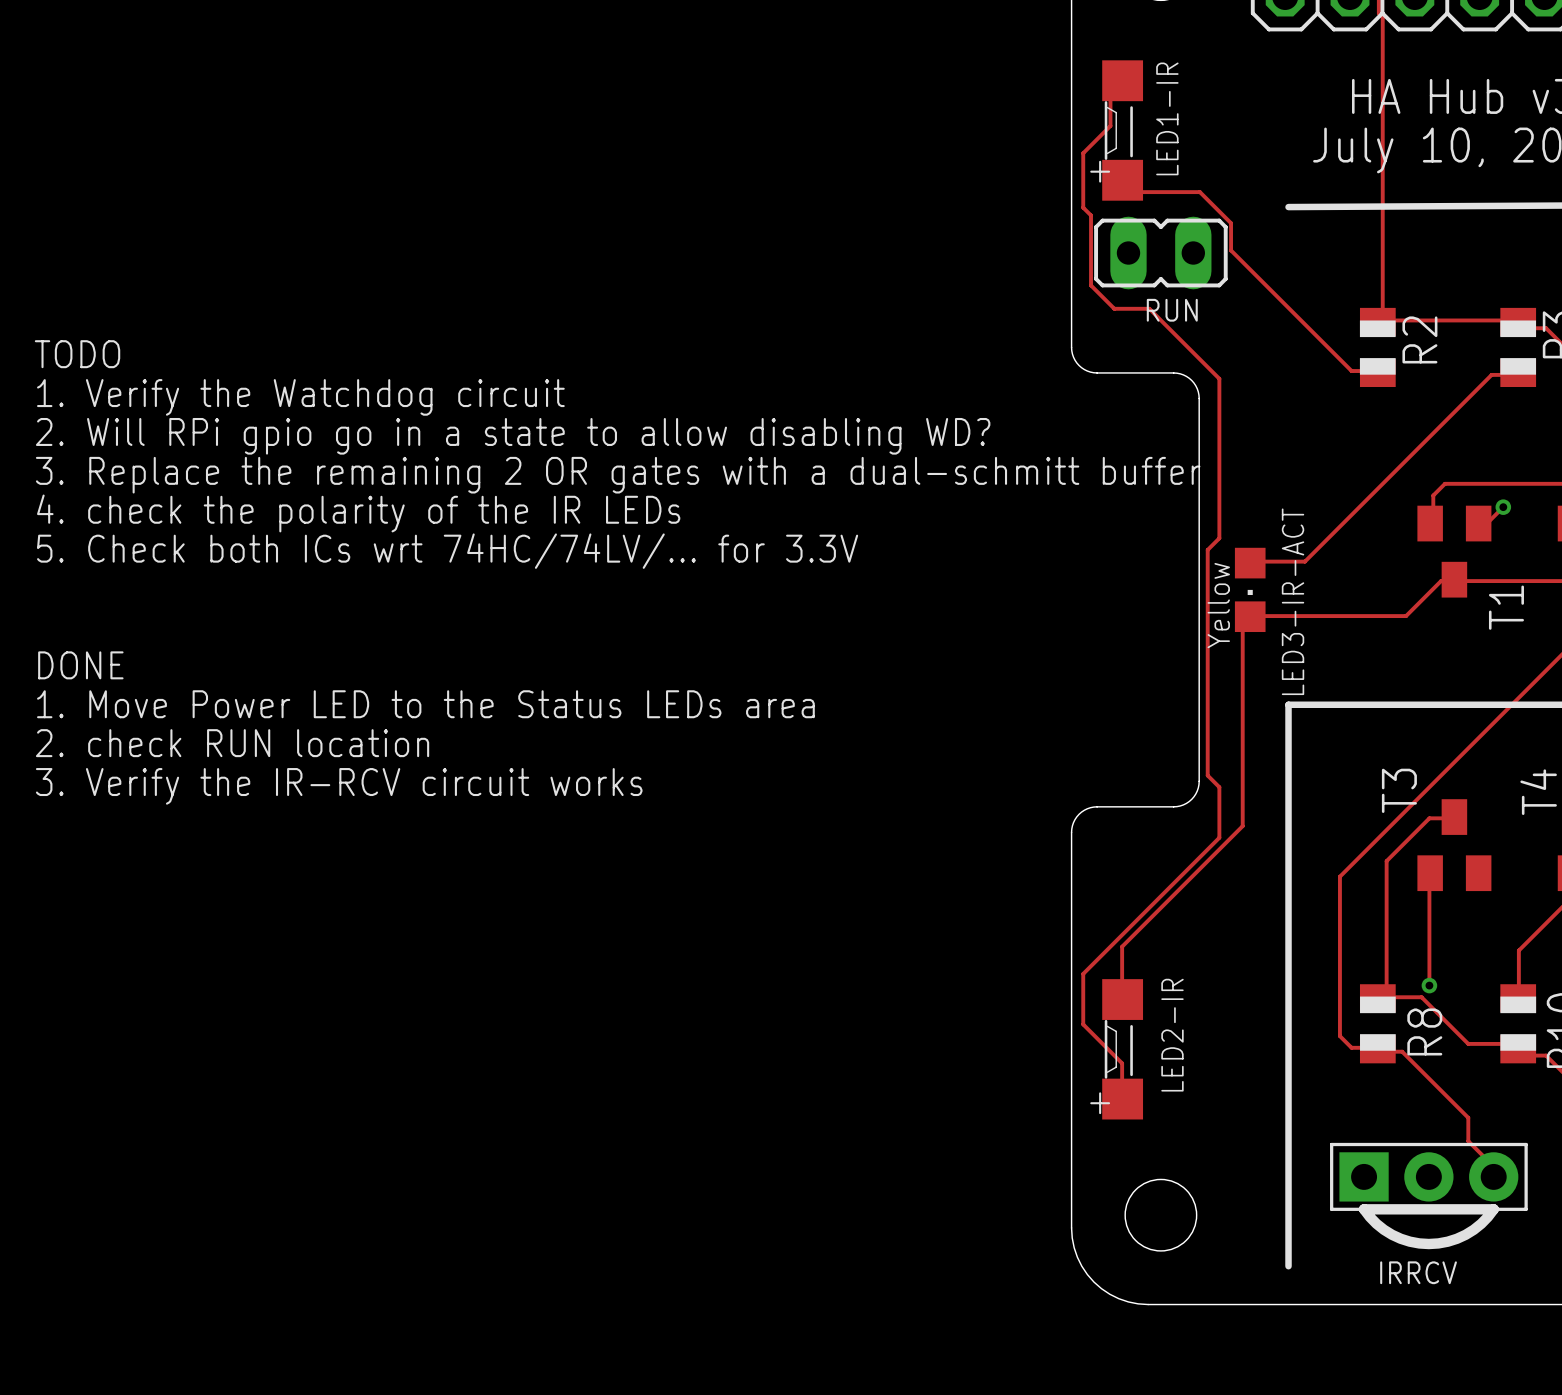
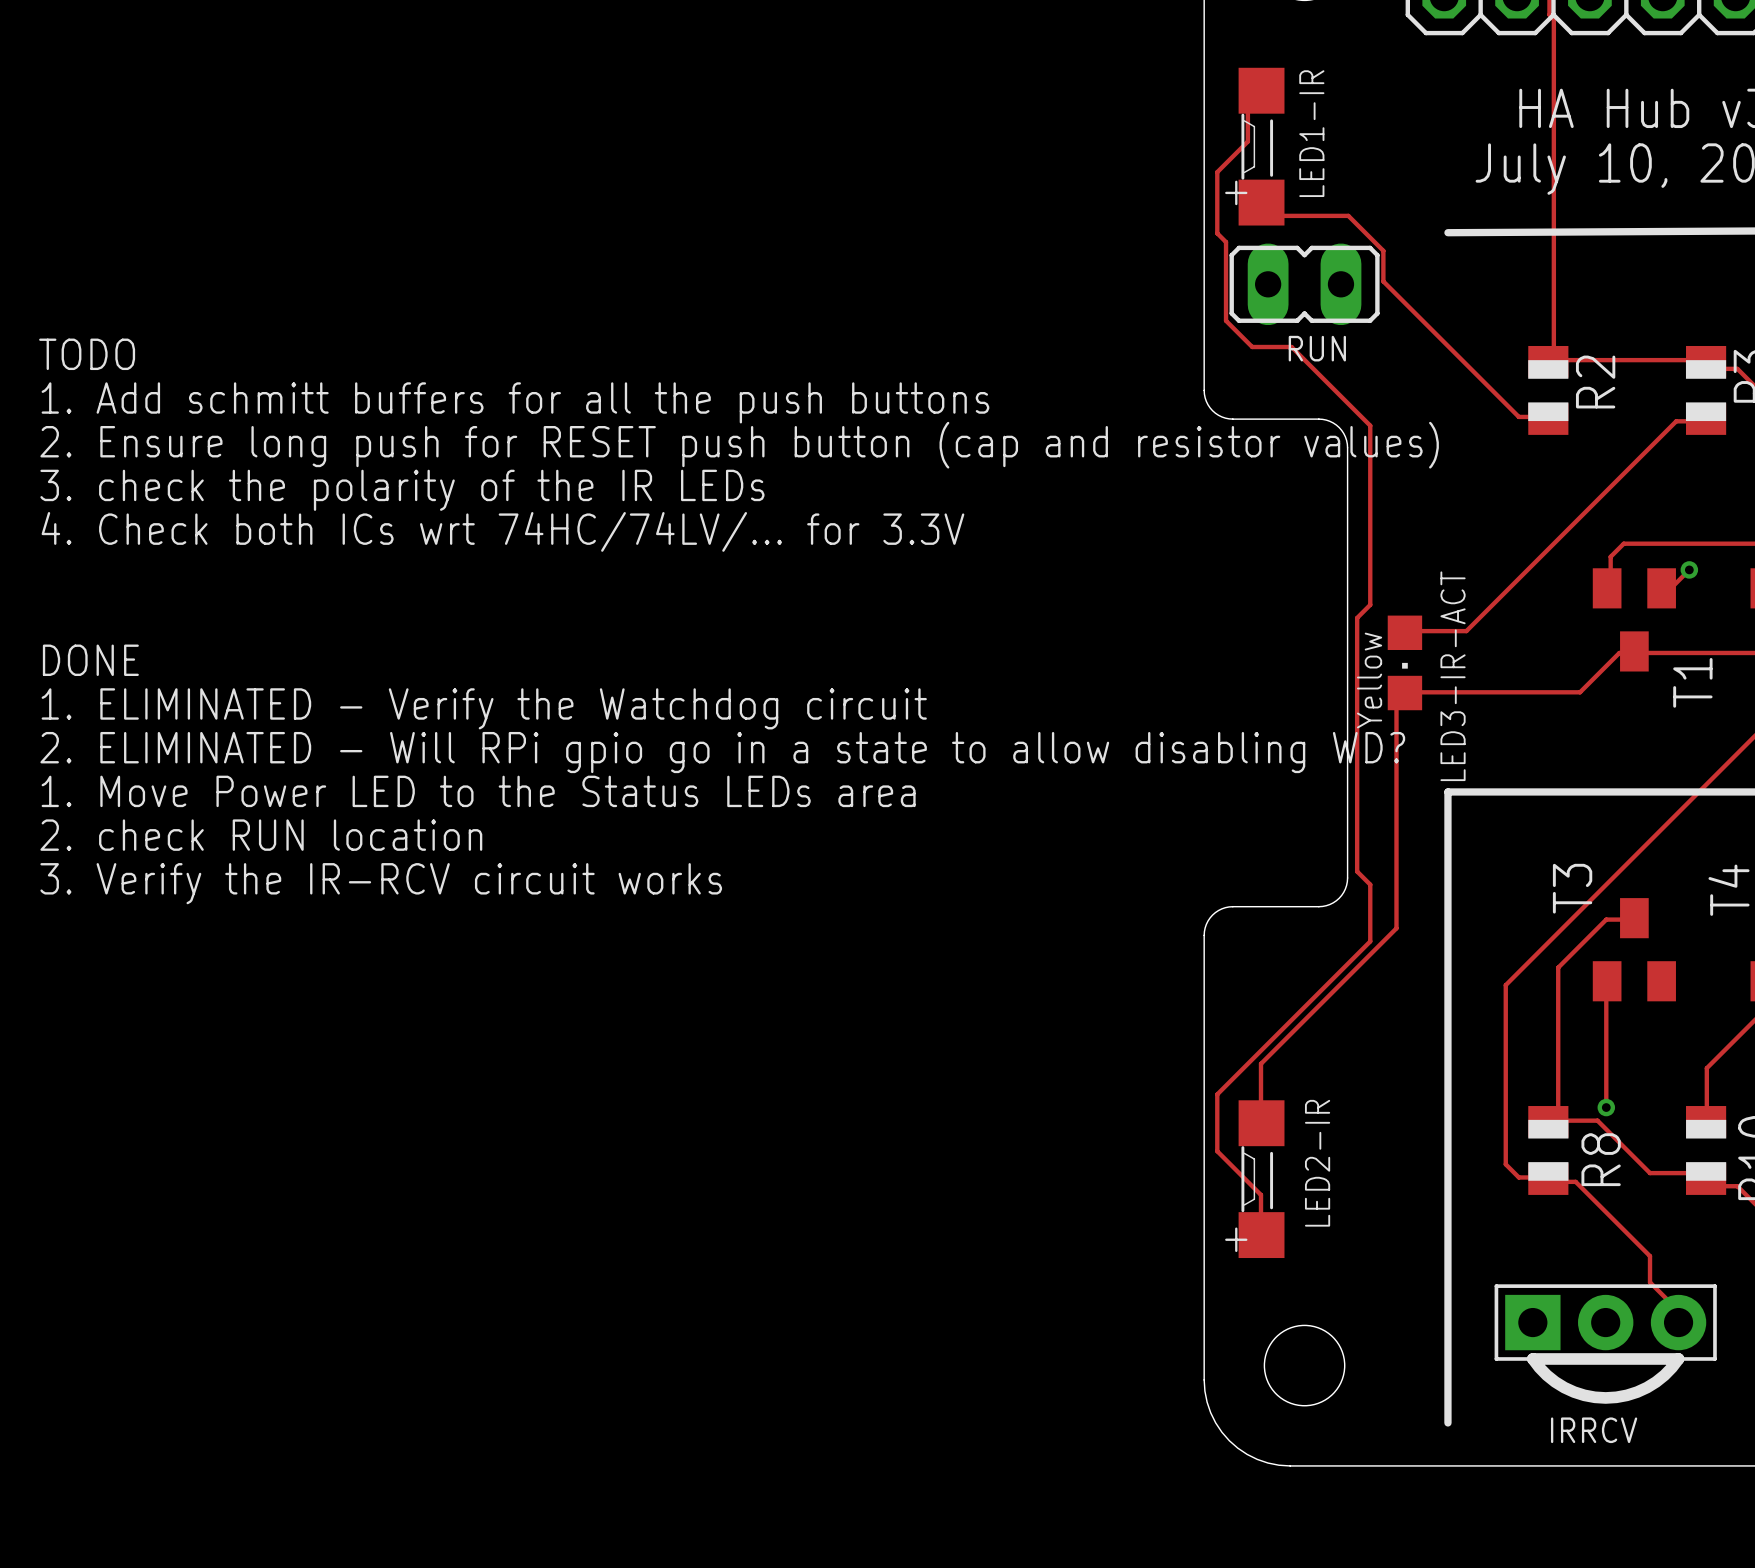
text: none -> TODO (87, 354)
text: TODO (77, 354) -> 1. Add schmitt buffers for all the push buttons (515, 402)
text: 1. Verify the Watchdog circuit (300, 397) -> 2. Ensure long push for RESET push button (cap and resistor values) (739, 445)
text: 2. Will RPi gpio go in a state to allow disabling WD? (513, 436) -> 3. check the polarity of the IR LEDs (402, 490)
text: 3. Replace the remaining 2 OR gates with a dual-schmitt buffer (618, 475) -> 4. Check both ICs wrt 74HC/74LV/... for 3.3V (502, 531)
text: 4. check the polarity of the IR LEDs (358, 513) -> none
text: 5. Check both ICs wrt 74HC/74LV/... for 3.3V (447, 551) -> none
text: none -> DONE (90, 660)
text: none -> 1. ELIMINATED - Verify the Watchdog circuit (484, 708)
text: DONE (80, 665) -> 2. ELIMINATED - Will RPi gpio go in a state to allow disabling WD? (722, 752)

